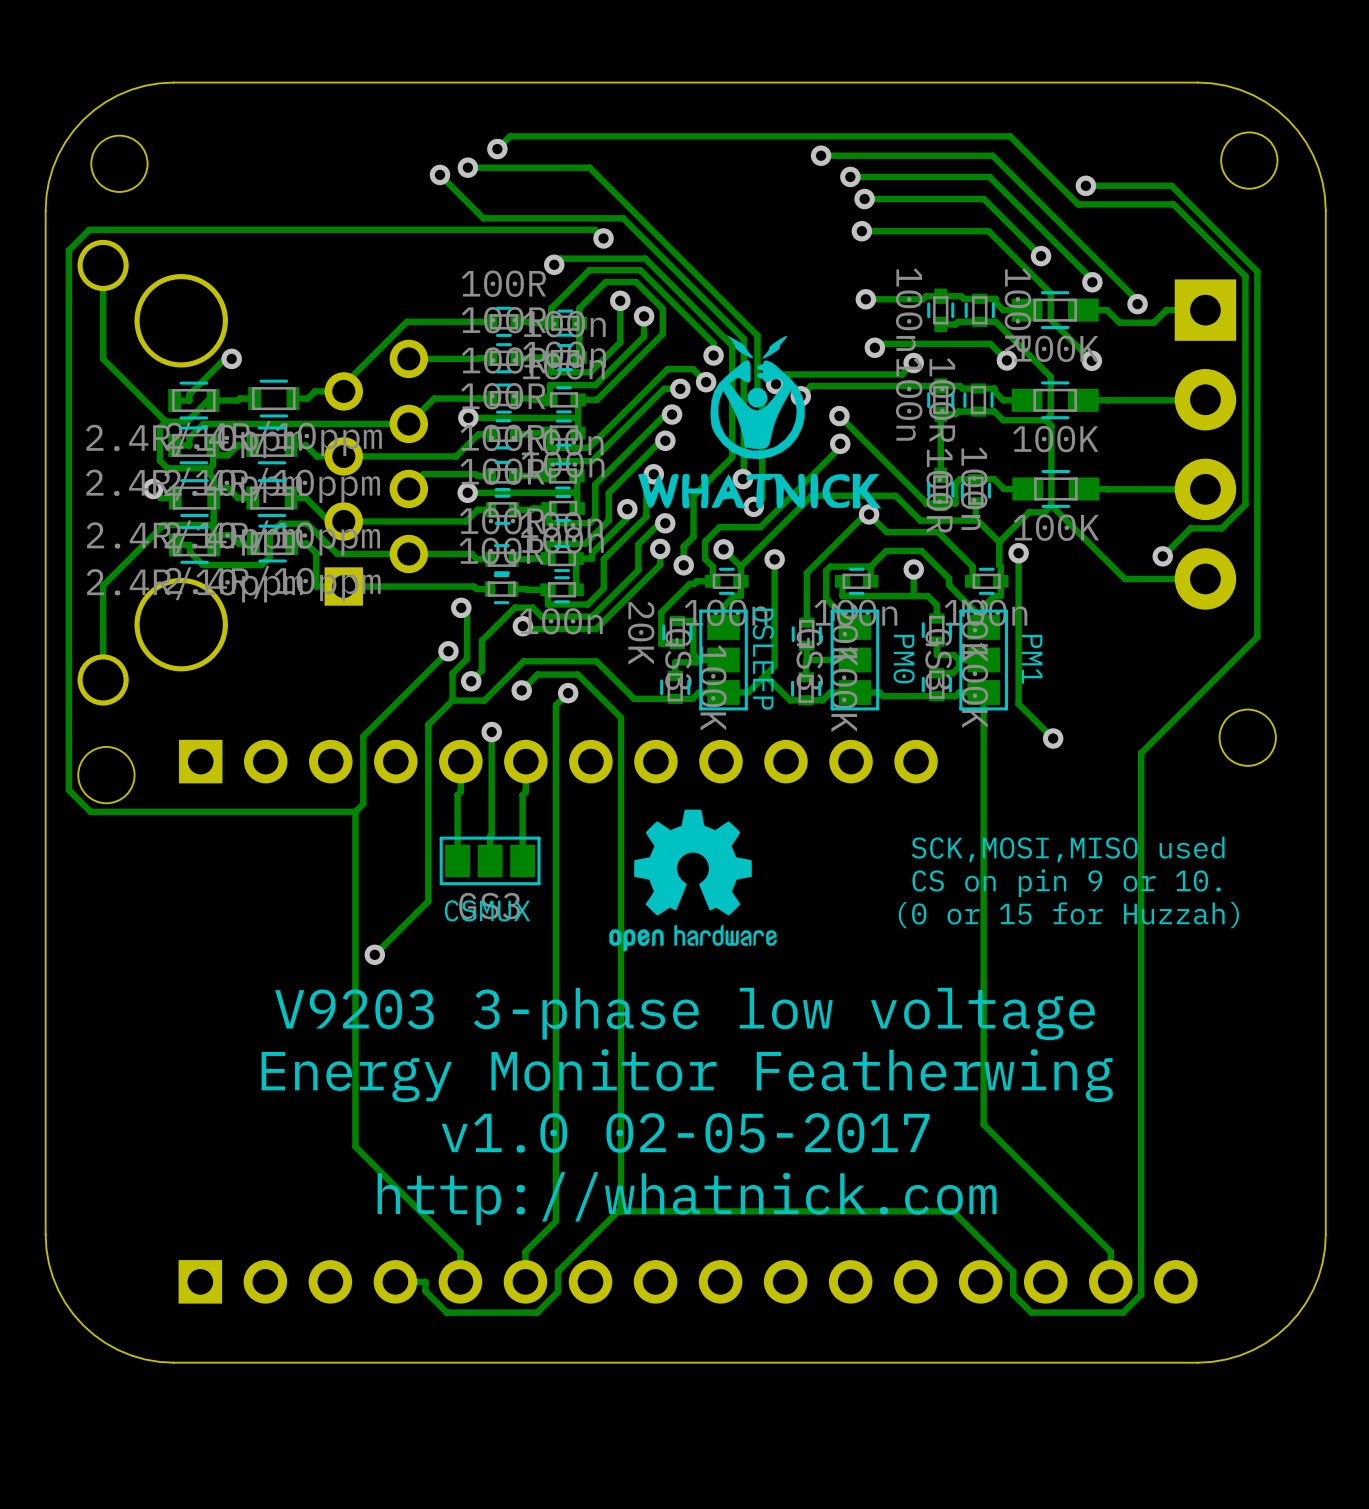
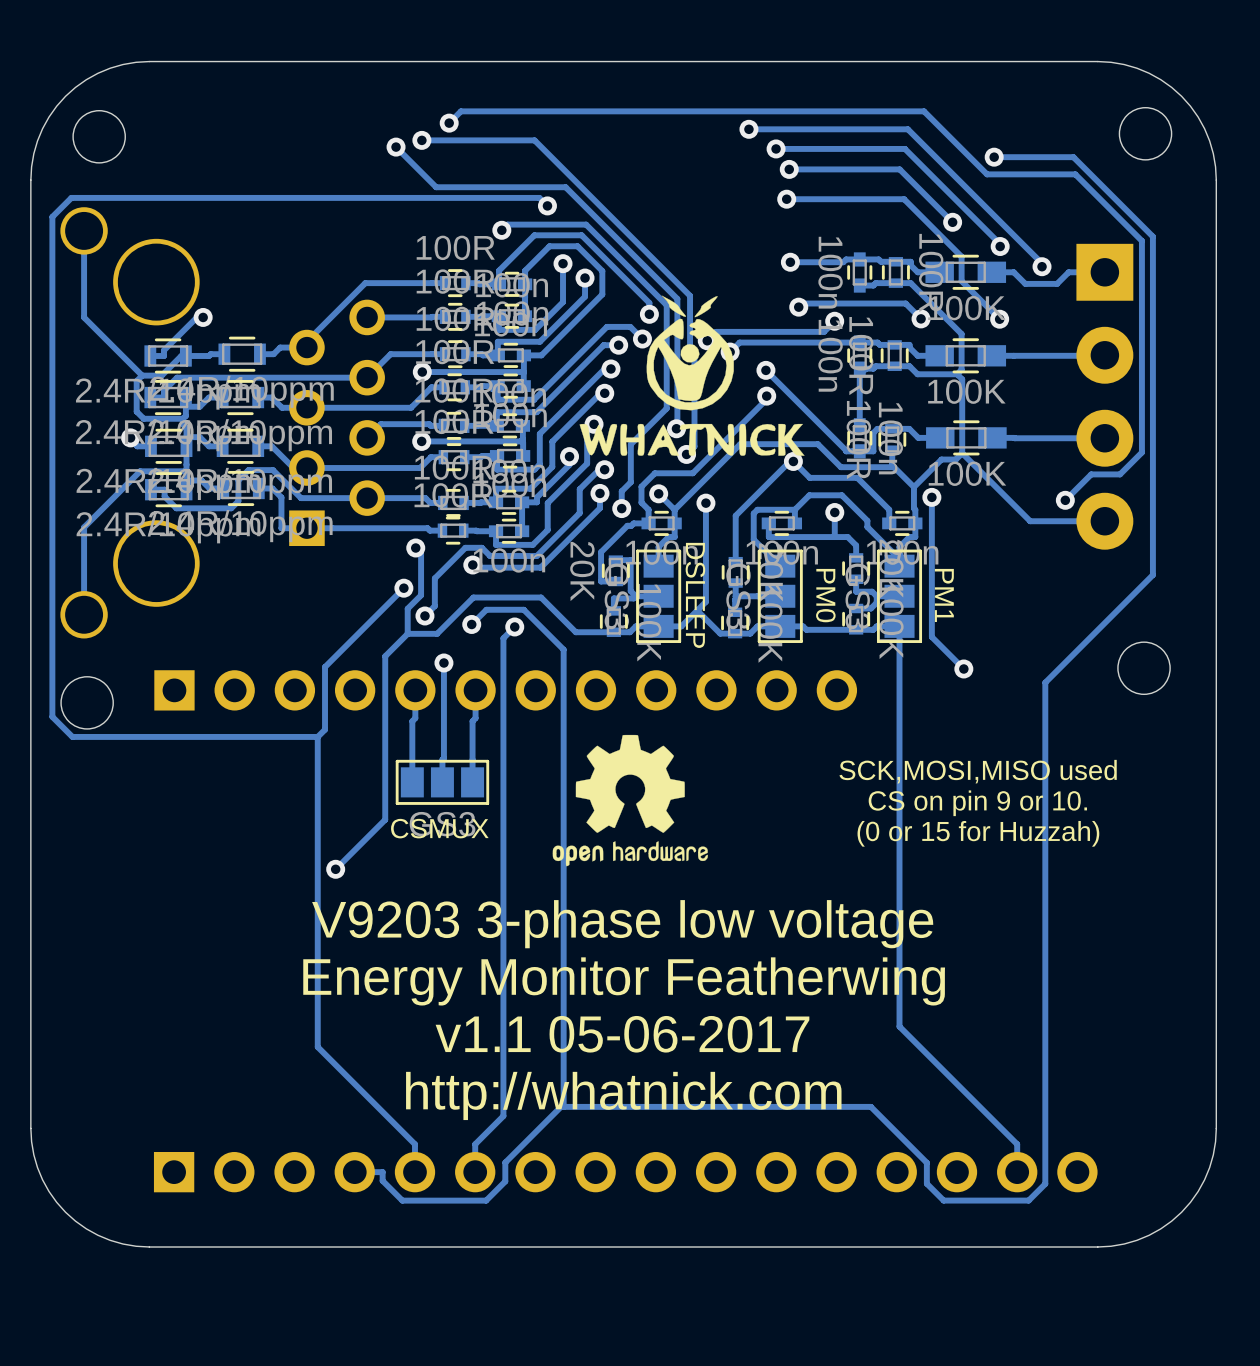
text: v1.0 02-05-2017 (685, 1132) -> v1.1 05-06-2017 (622, 1034)

